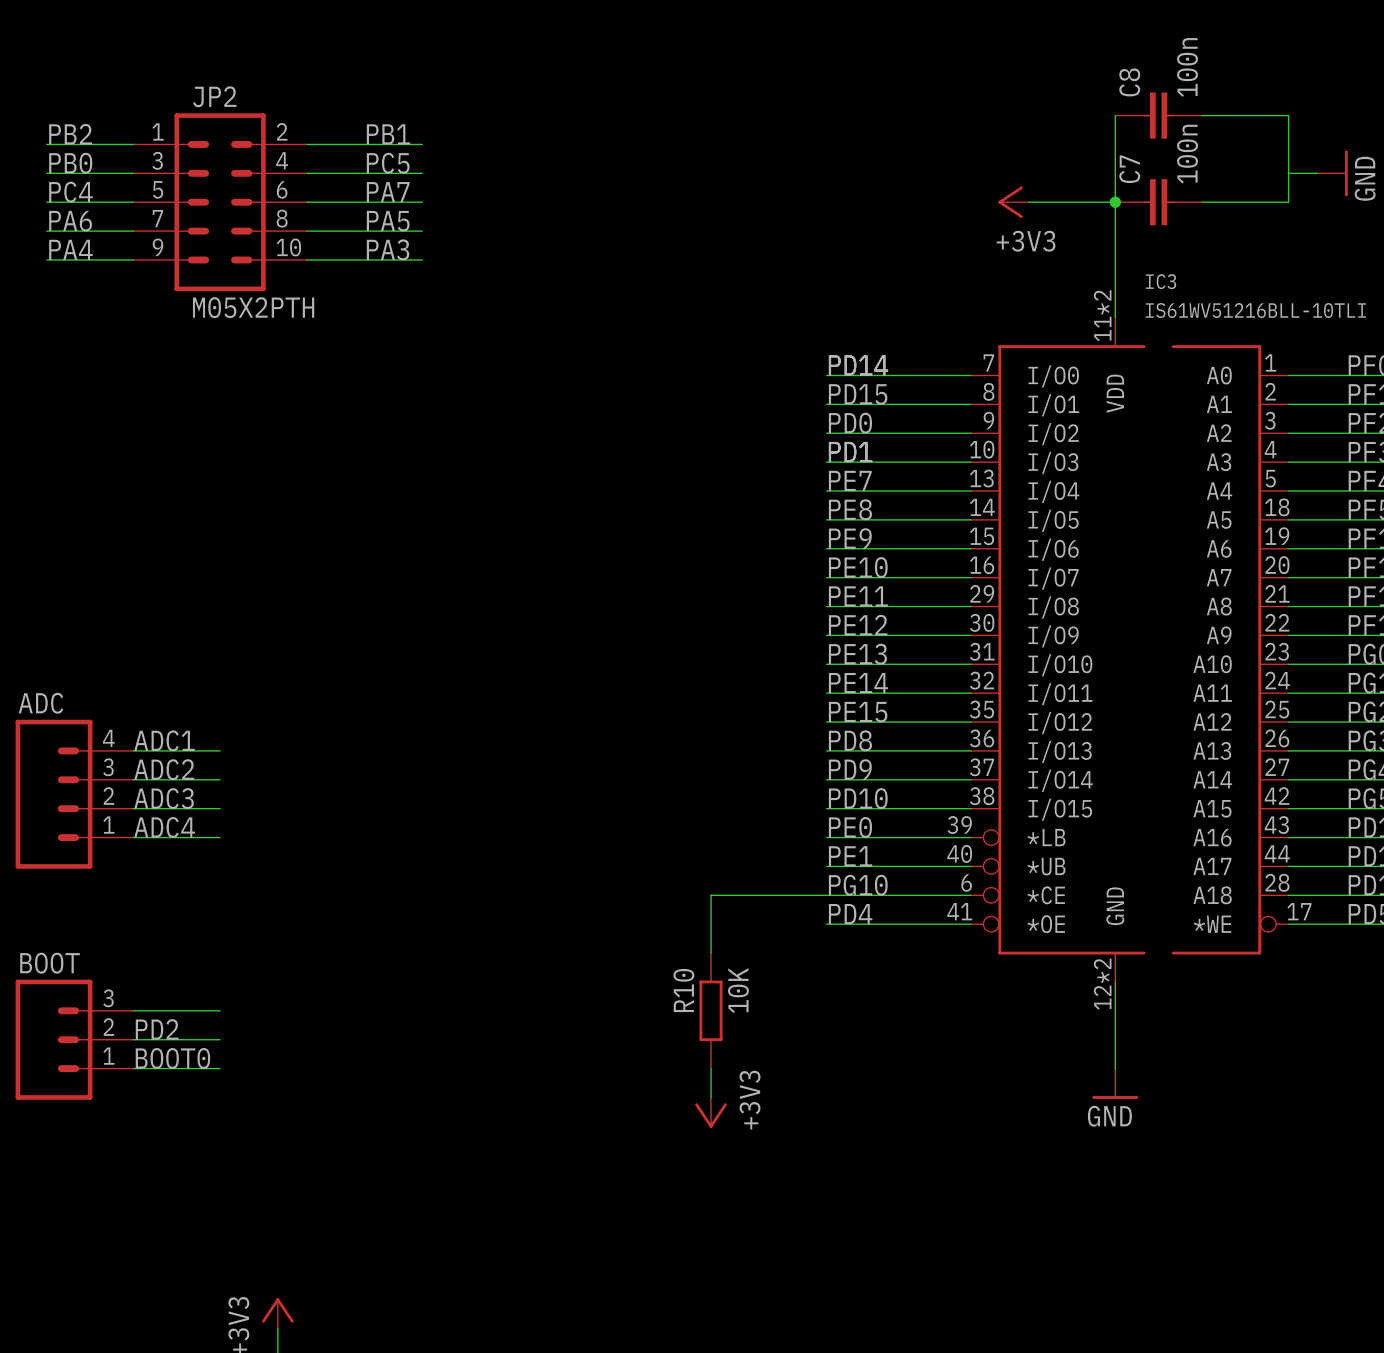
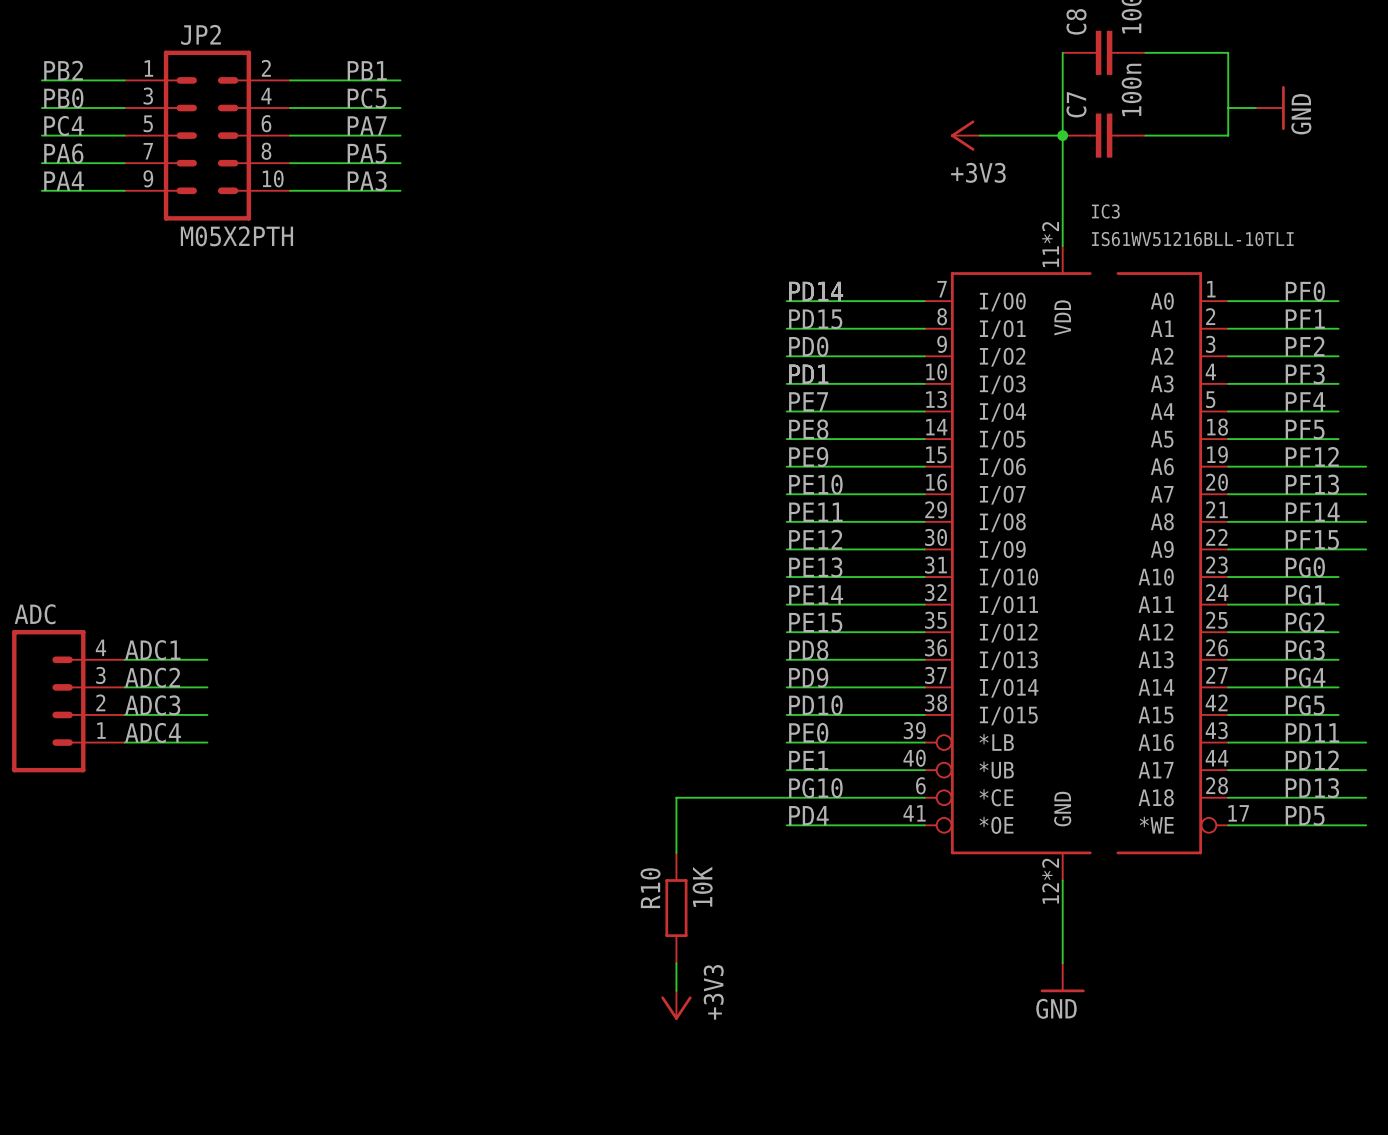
wire: (133, 1010) (220, 1010) -> none
label: PD2 (157, 1029) -> none
BOOT: (74, 1039) -> none
wire: (133, 1039) (220, 1039) -> none
label: BOOT0 (172, 1058) -> none
wire: (133, 1068) (220, 1068) -> none

